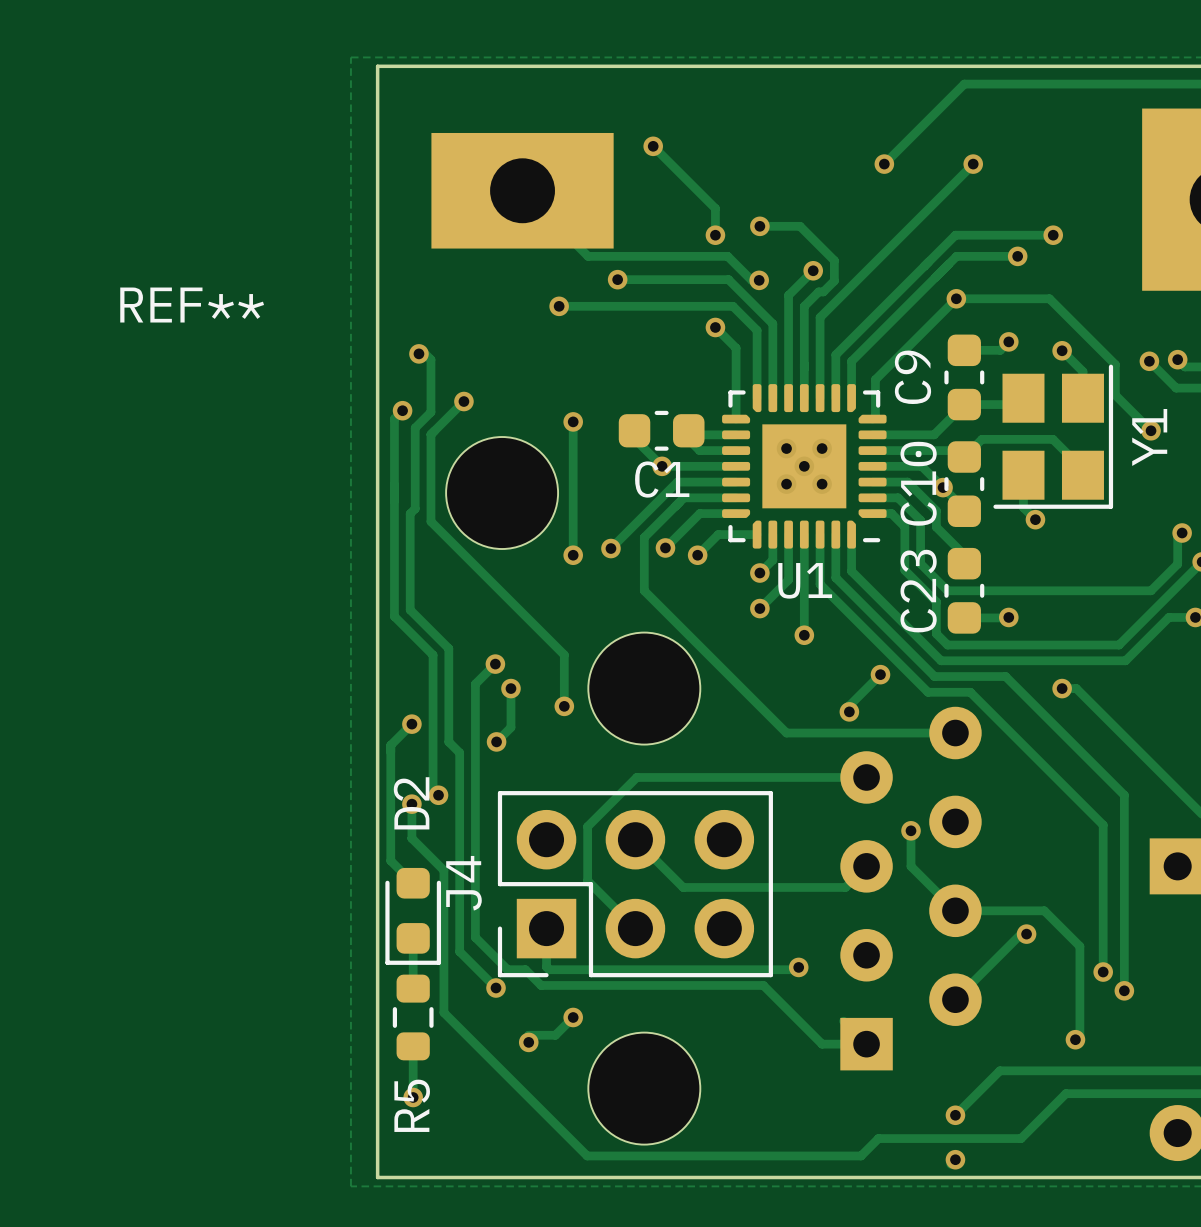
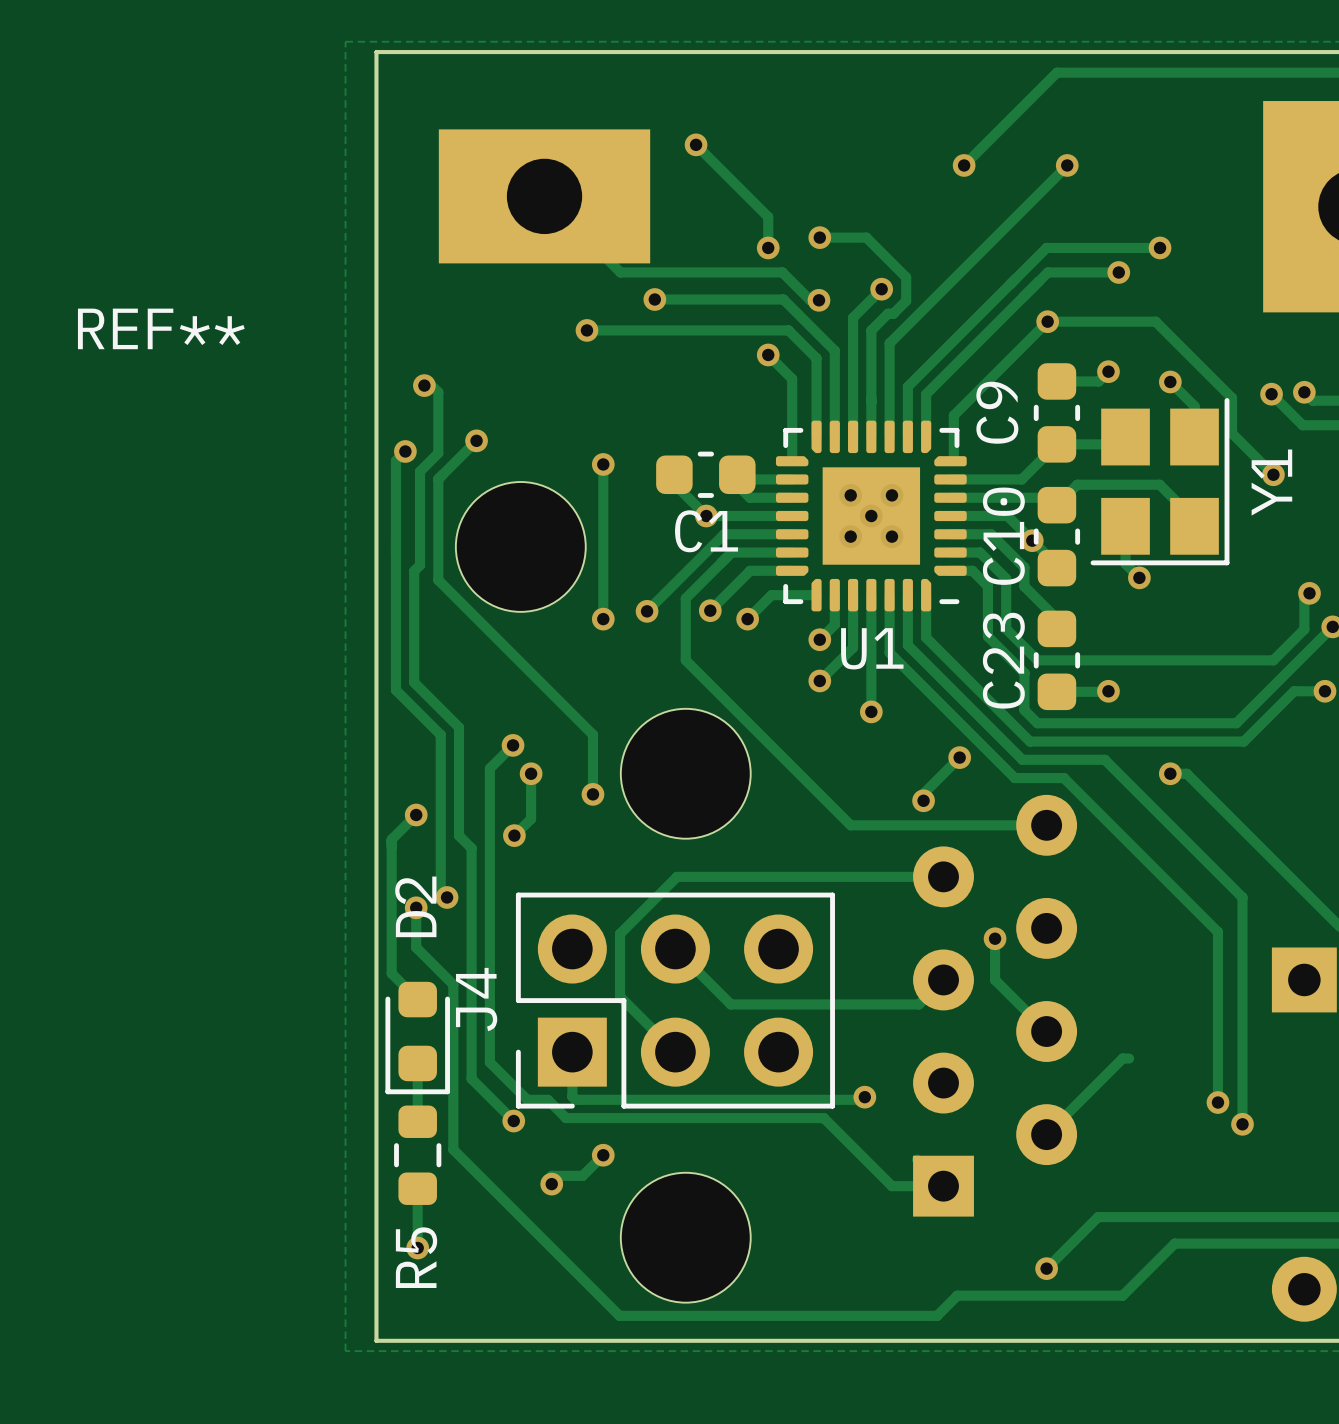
track: (955, 910) (1044, 910) (1079, 946) (1079, 1035) (1075, 1039) -> none
via: (1026, 934) -> none
via: (1075, 1039) -> none
via: (955, 1159) -> none

